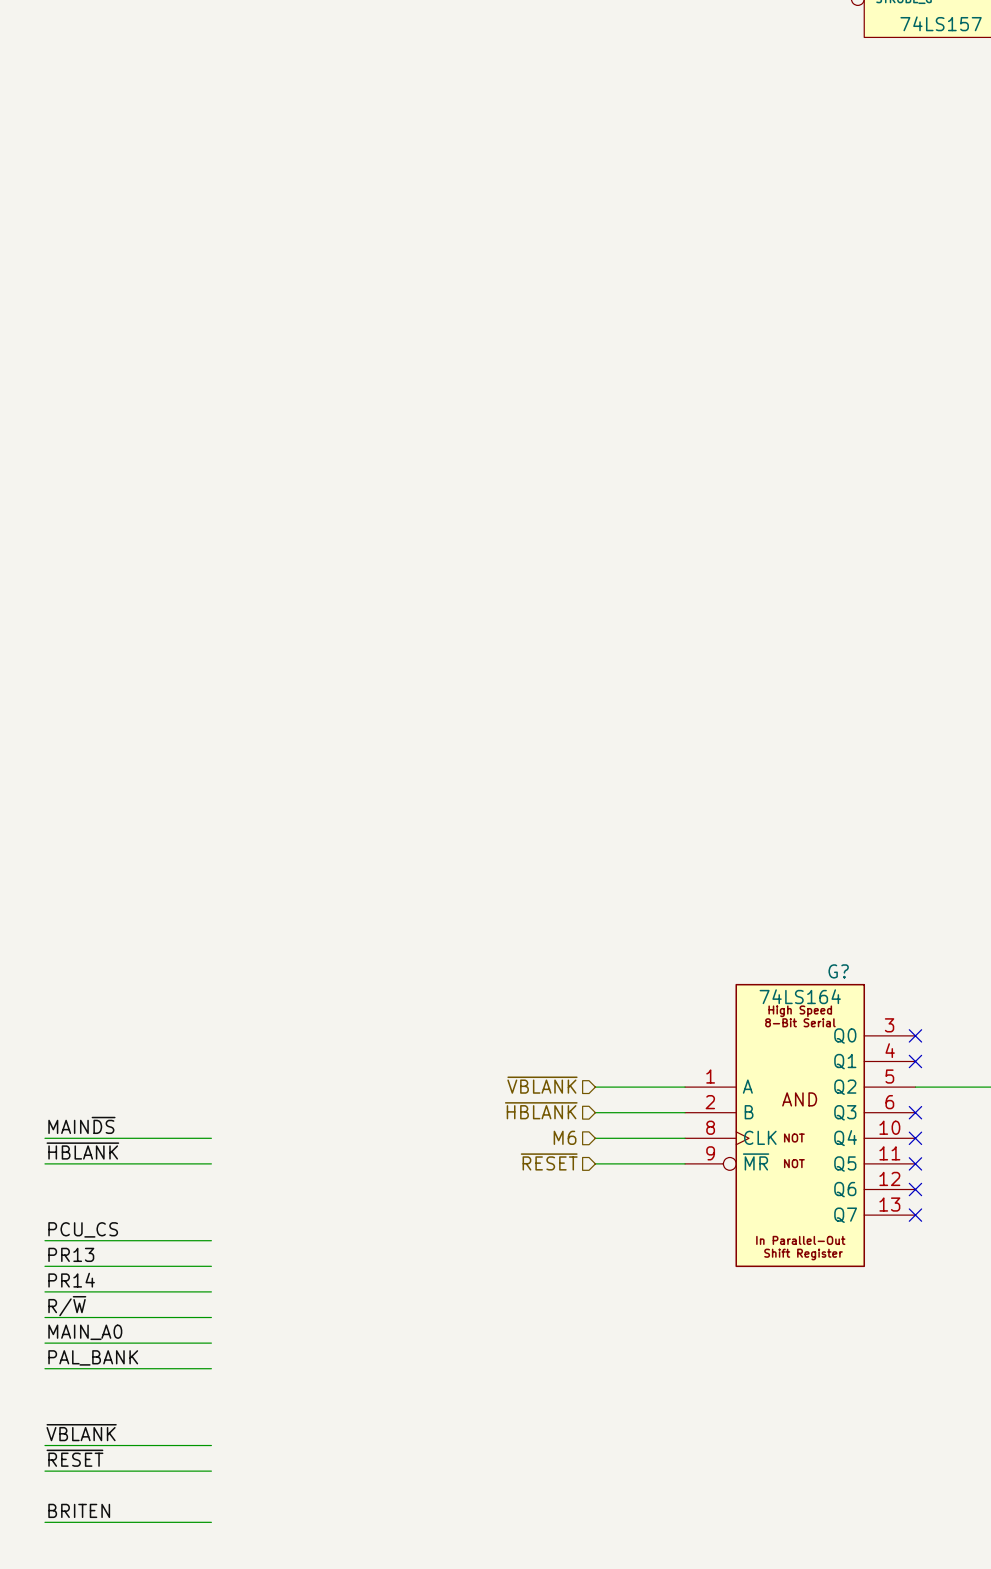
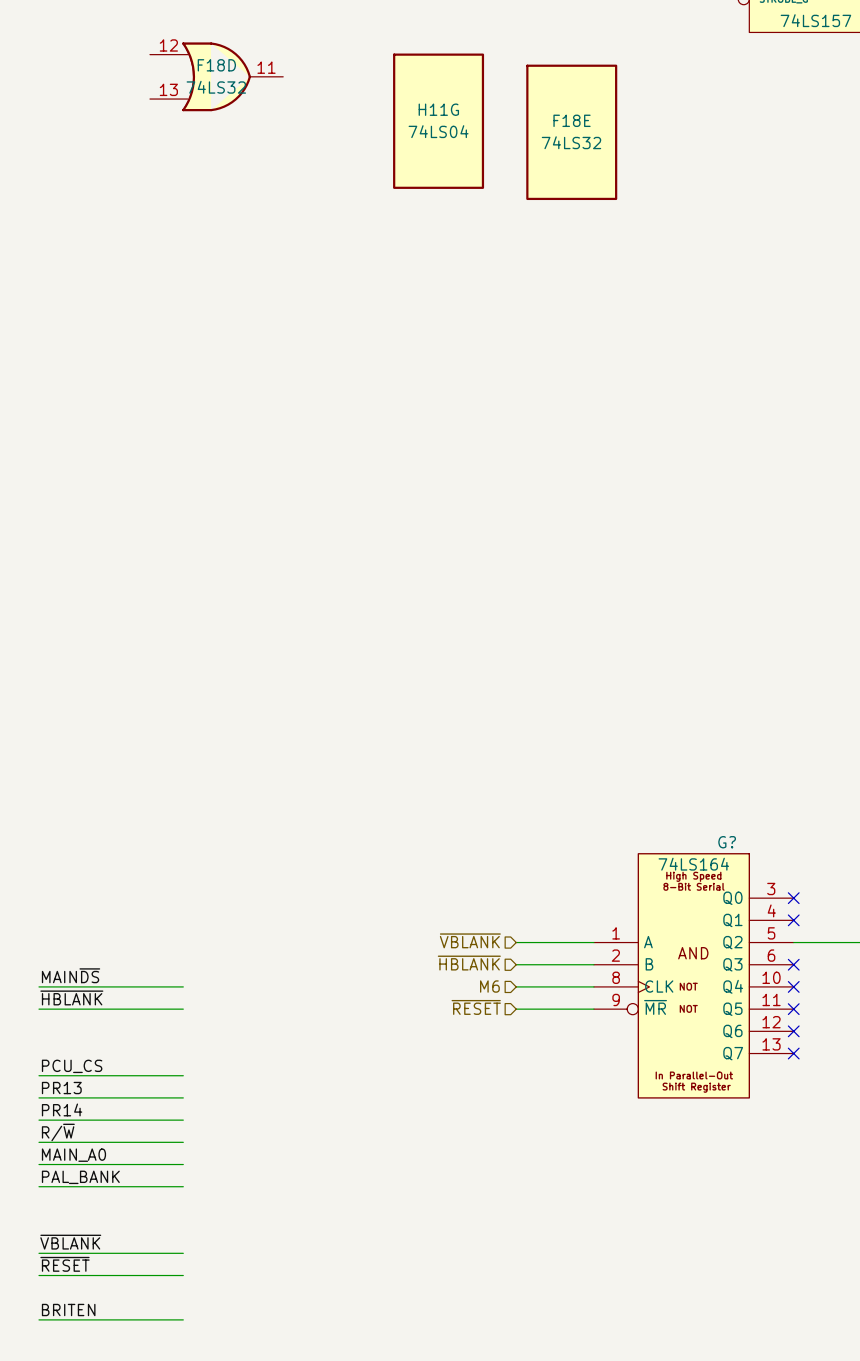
F18D: none -> 74LS32 (216, 76)
H11G: none -> 74LS04 (438, 121)
F18E: none -> 74LS32 (571, 132)

